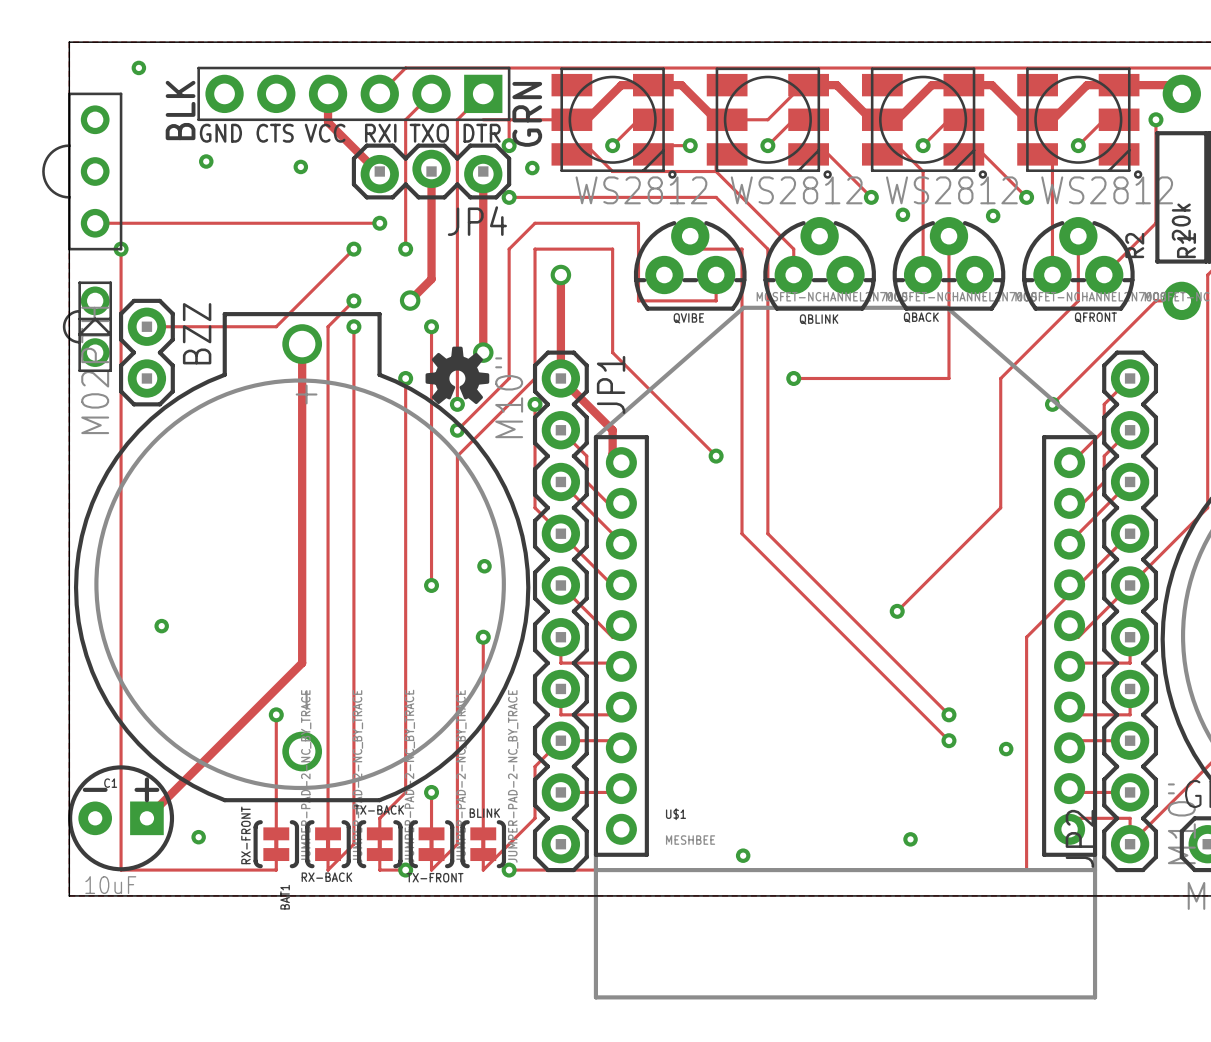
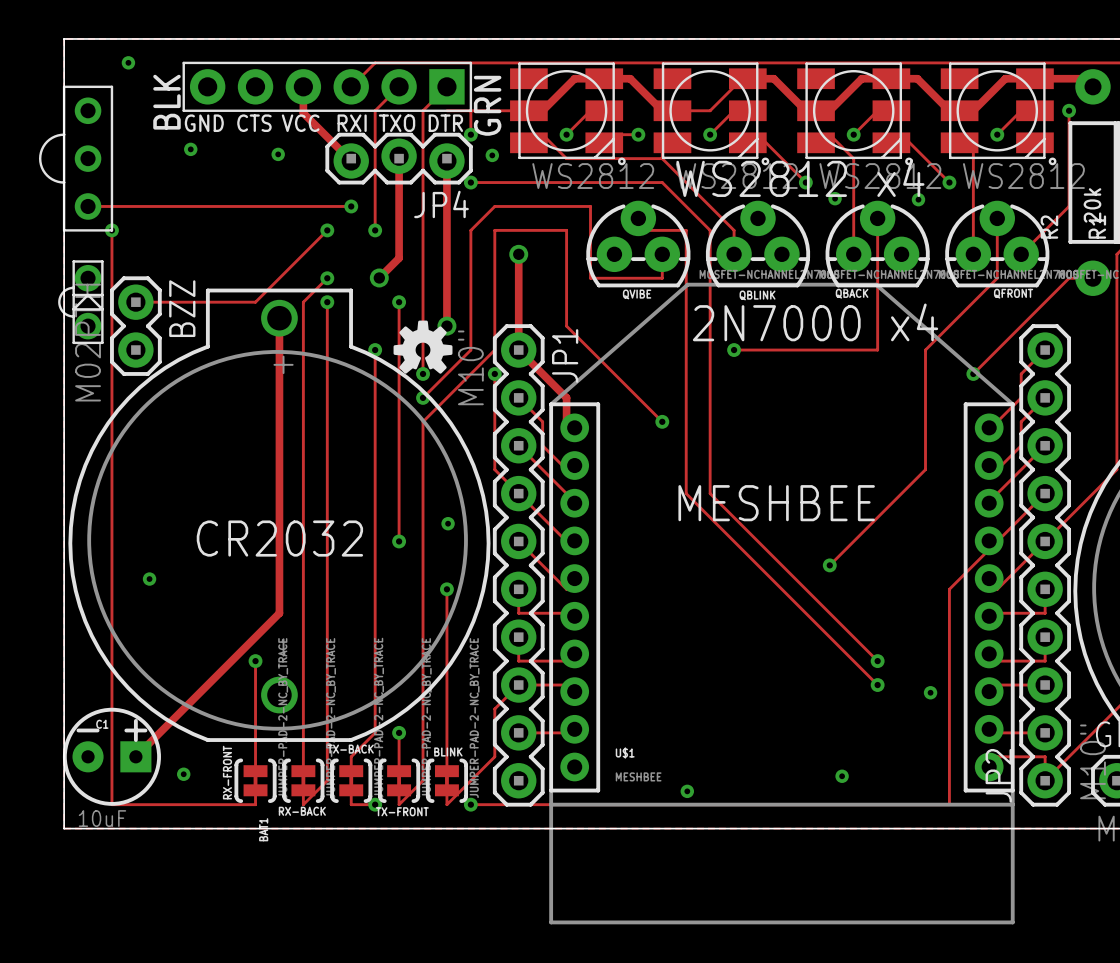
text: none -> WS2812 x4 (800, 178)
text: none -> 2N7000 x4 (815, 322)
text: none -> MESHBEE (776, 503)
text: none -> CR2032 (279, 538)

